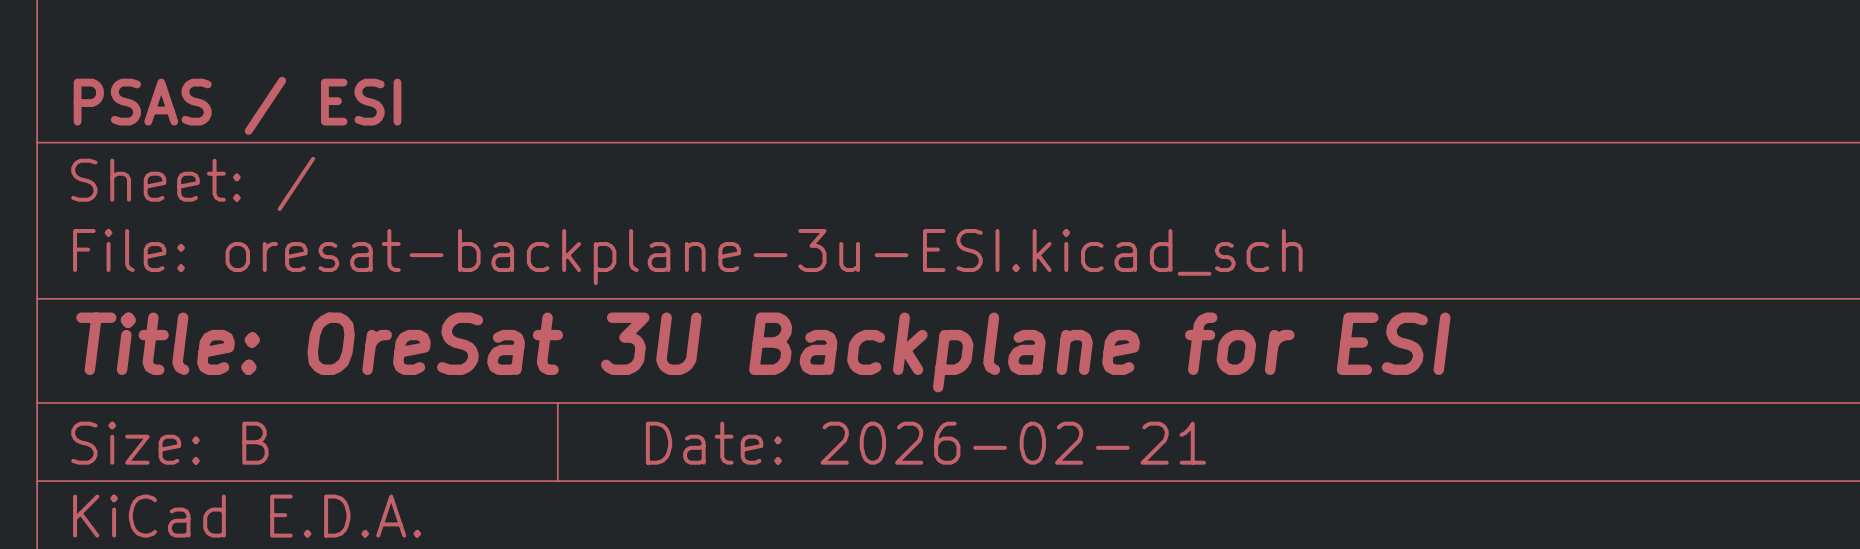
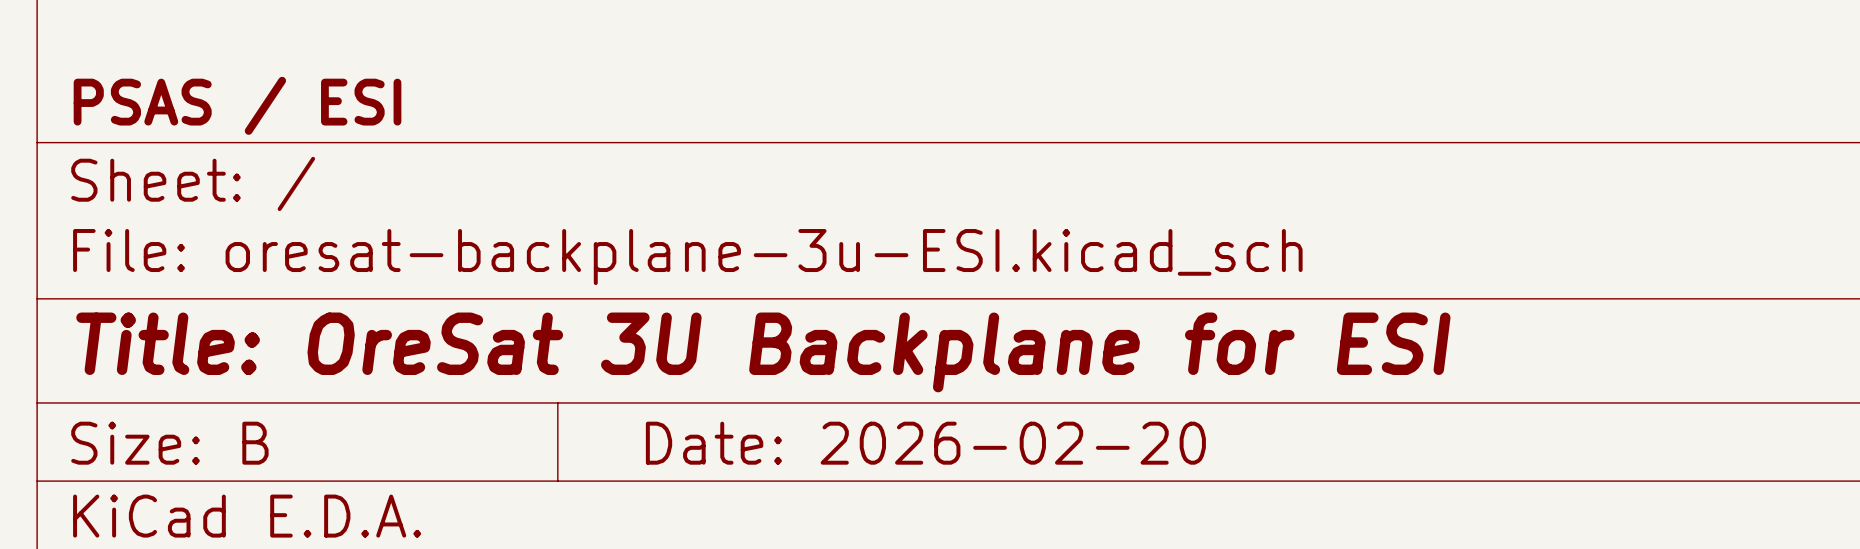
title block: Date: 2026-02-21 (925, 443) -> Date: 2026-02-20 (925, 443)

